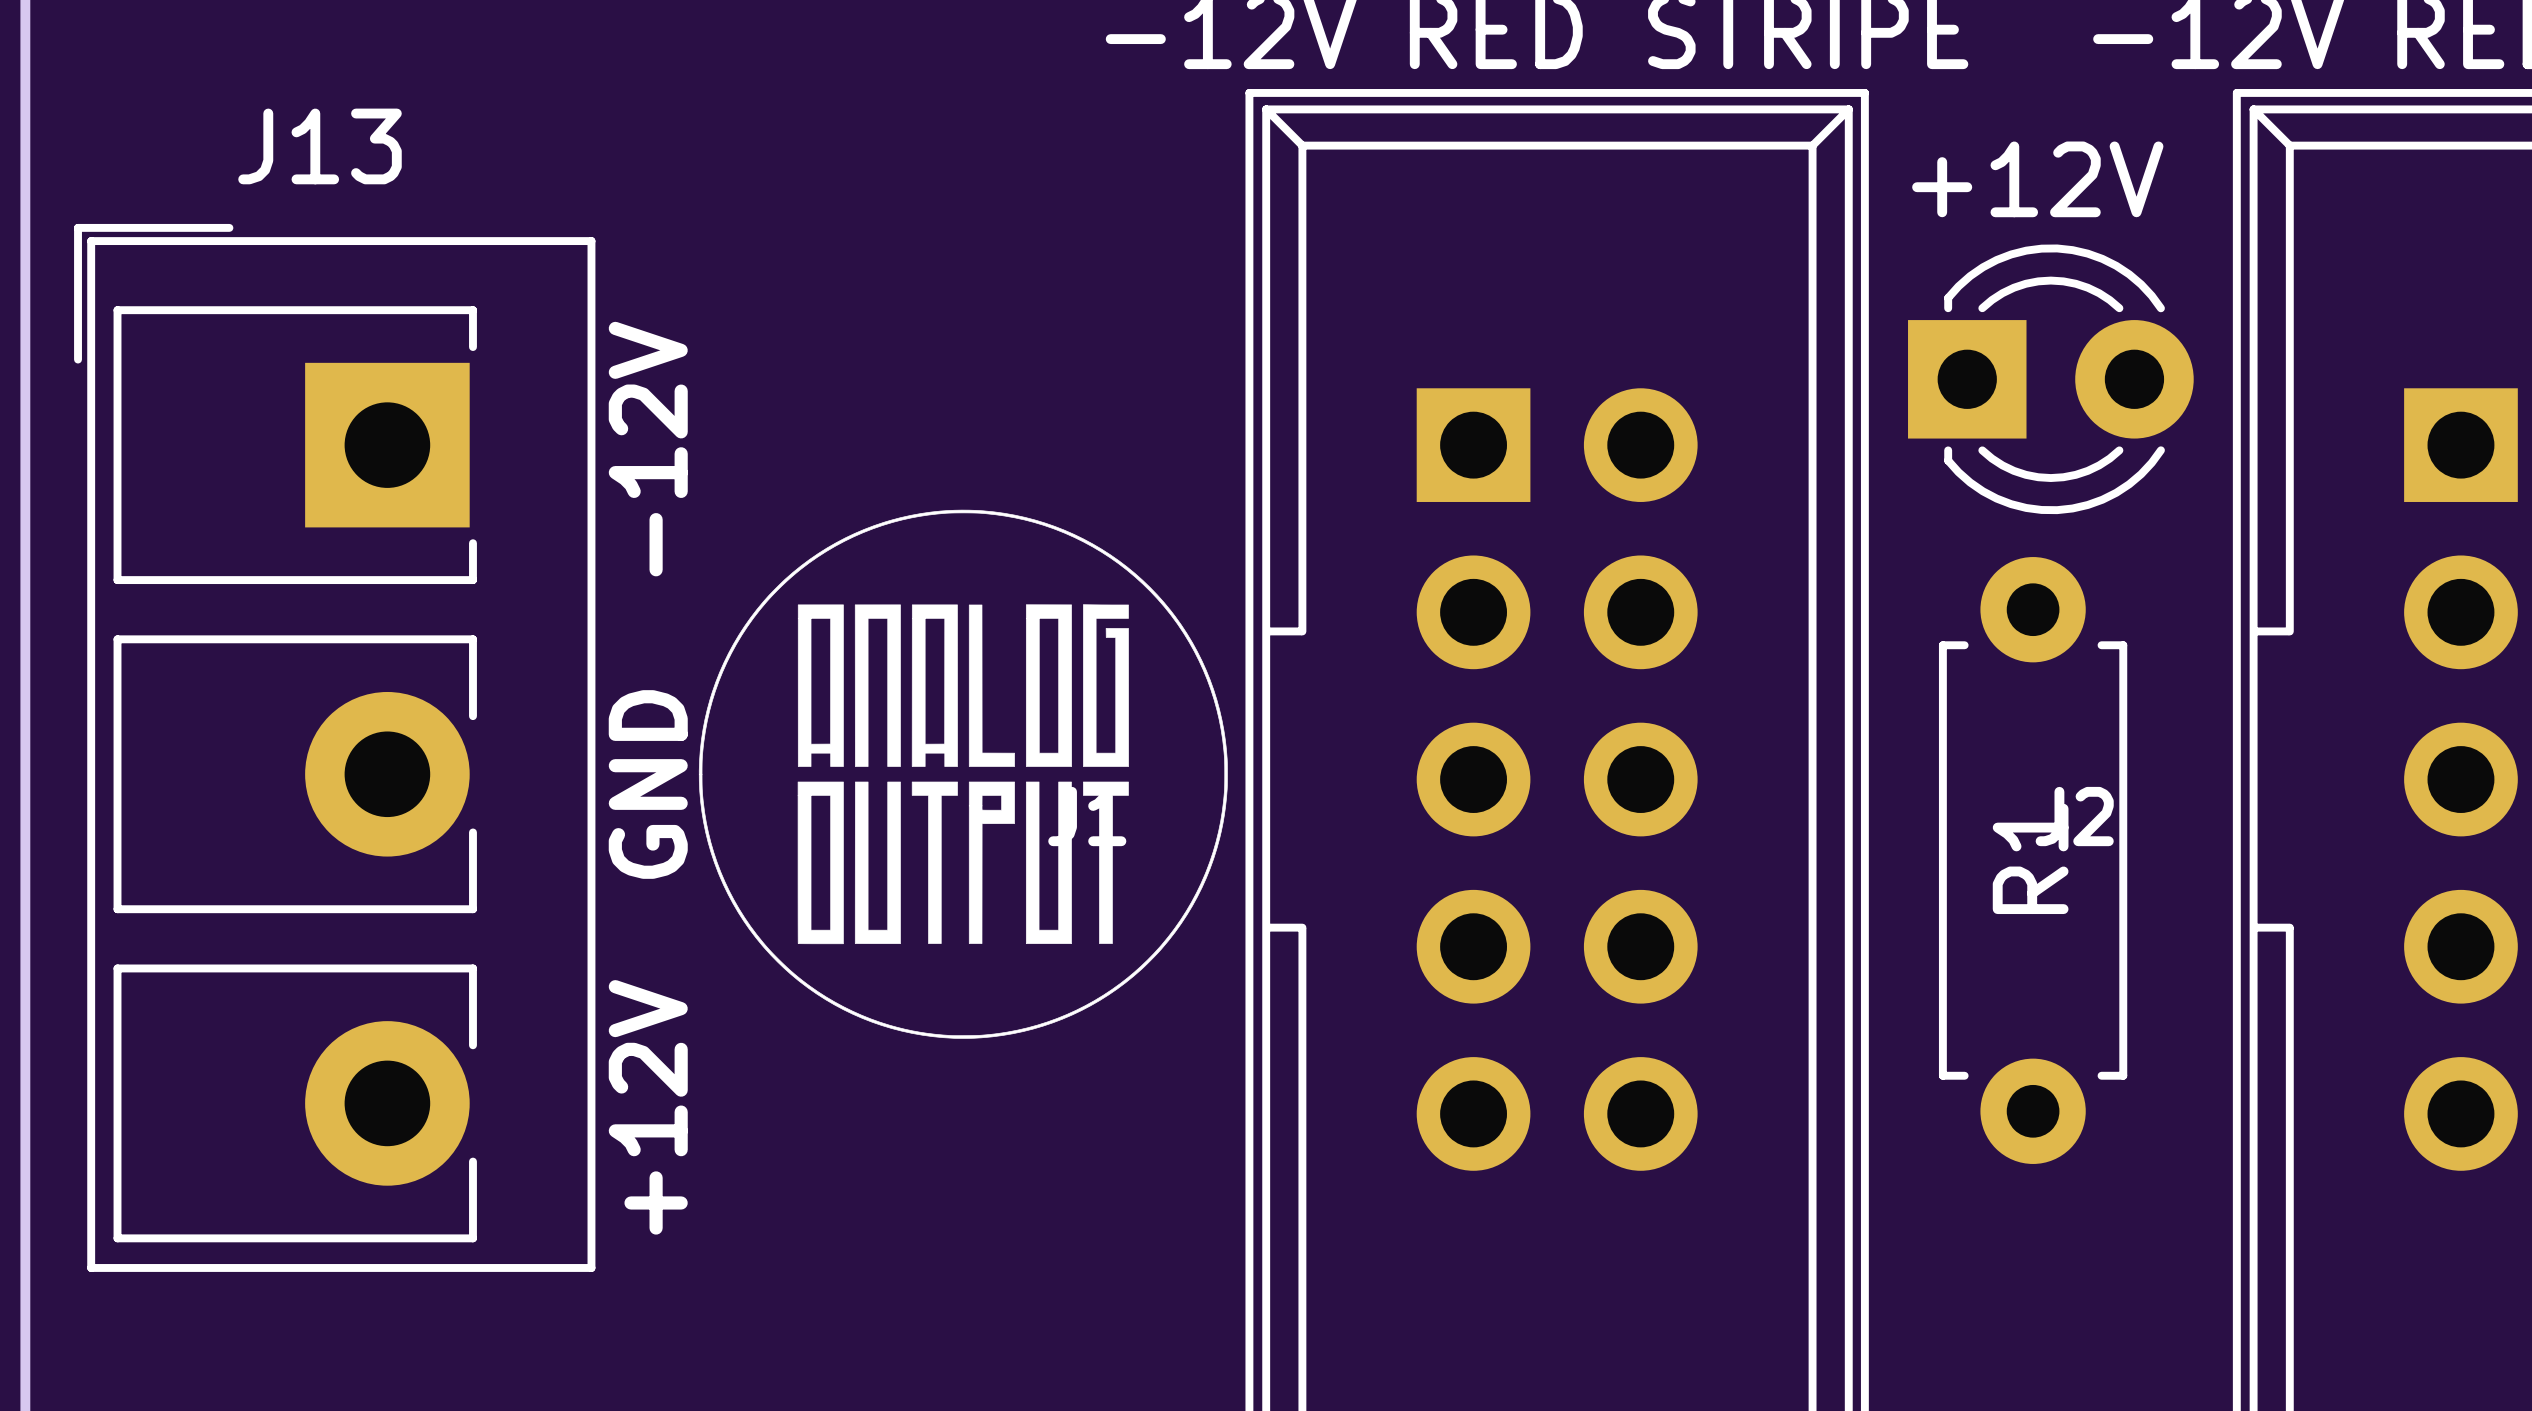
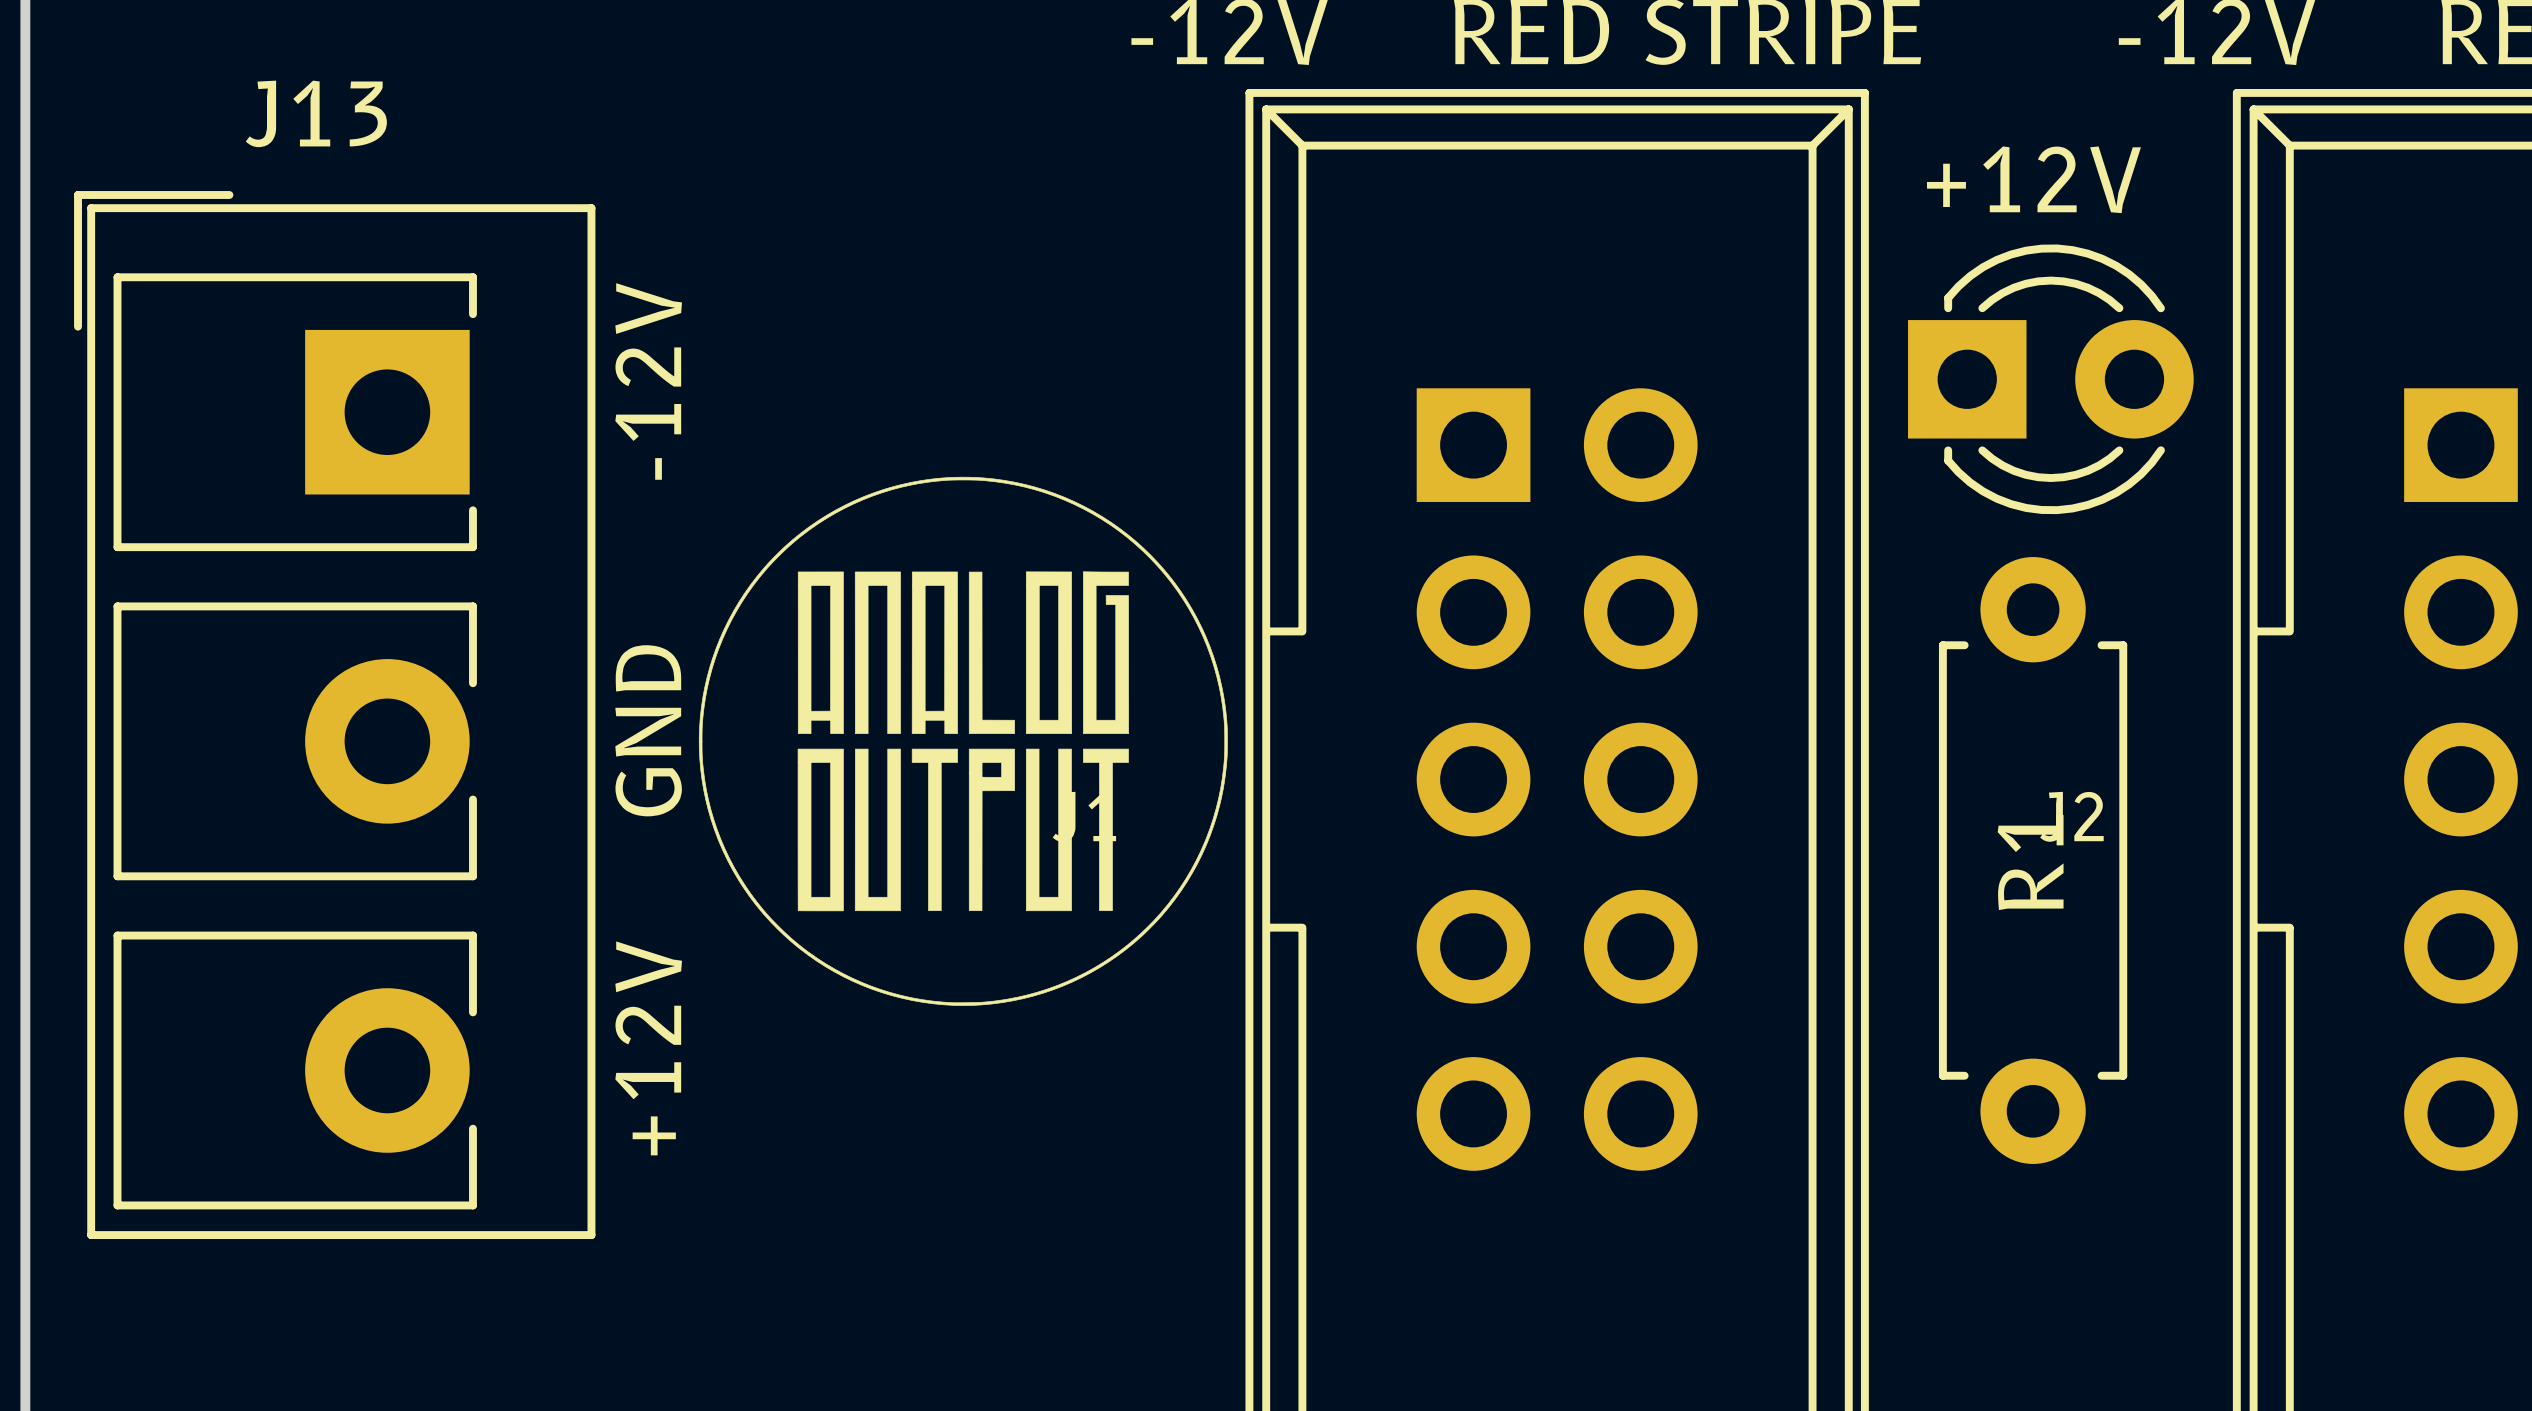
text position: -12V (648, 449) -> -12V (648, 381)
J13 position: (334, 747) -> (334, 715)
drawing position: (963, 774) -> (963, 741)
text position: GND (648, 784) -> GND (648, 730)
text position: +12V (648, 1107) -> +12V (648, 1048)

